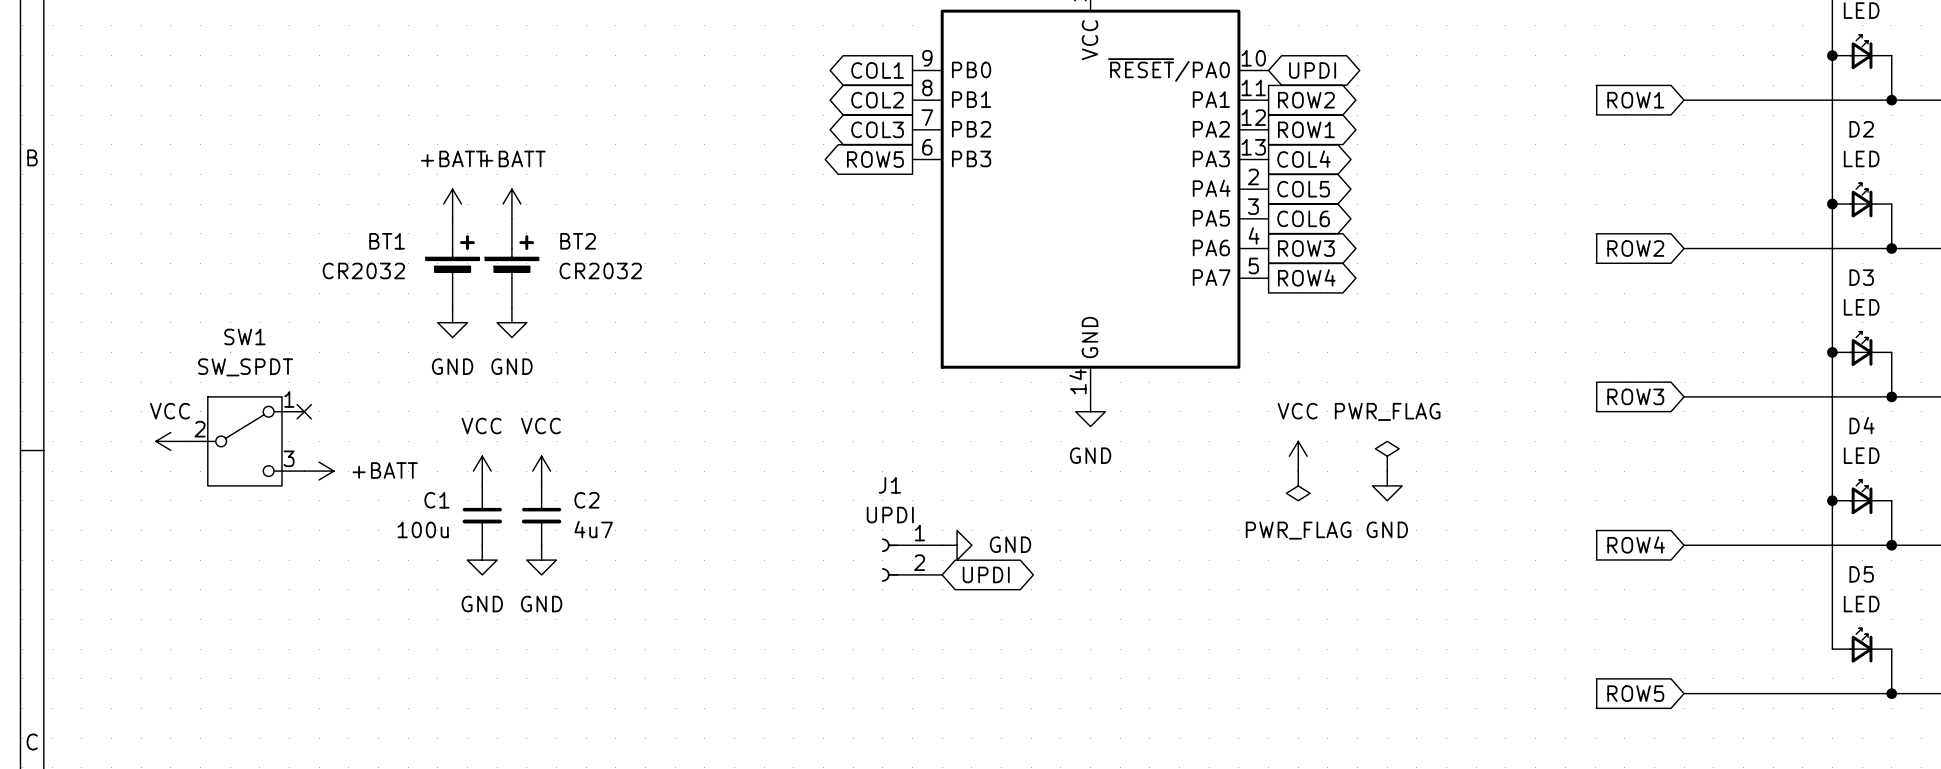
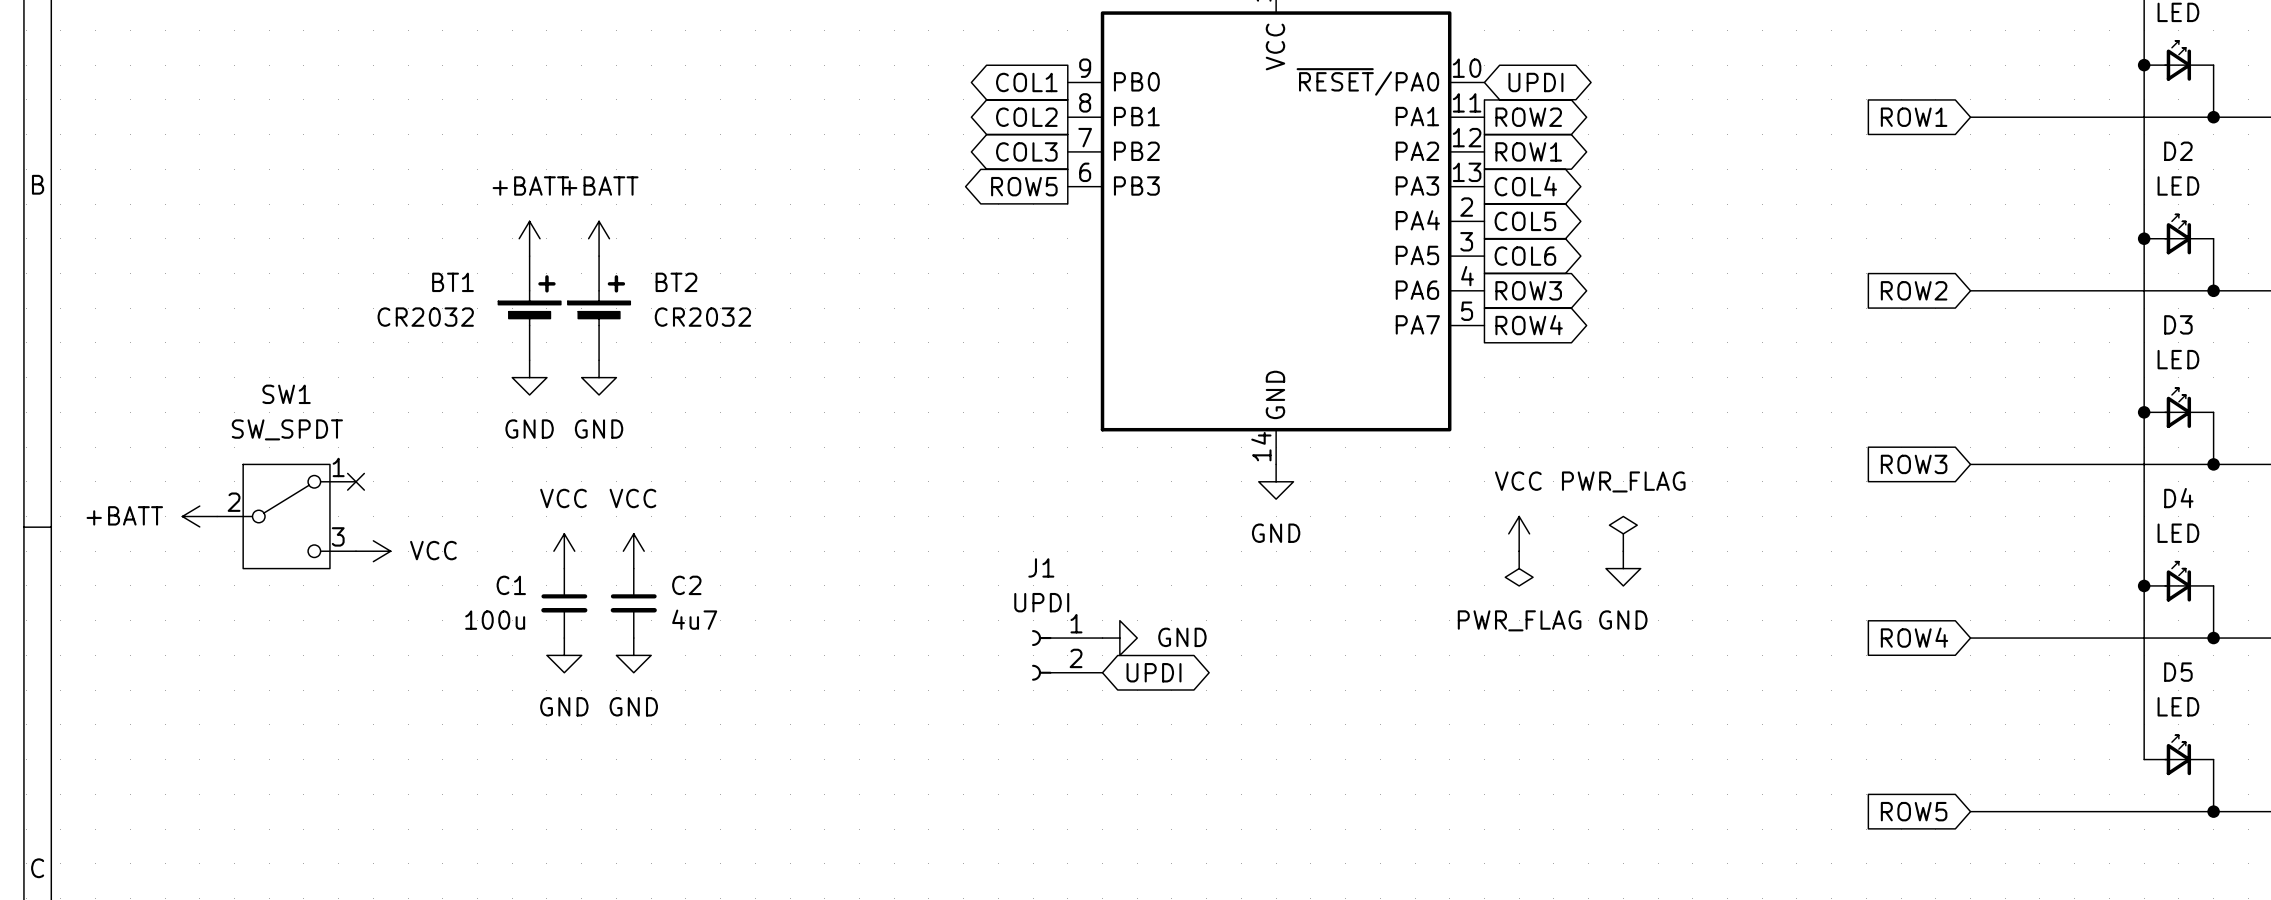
power symbol: VCC (170, 441) -> +BATT (199, 516)
power symbol: +BATT (319, 471) -> VCC (373, 551)

